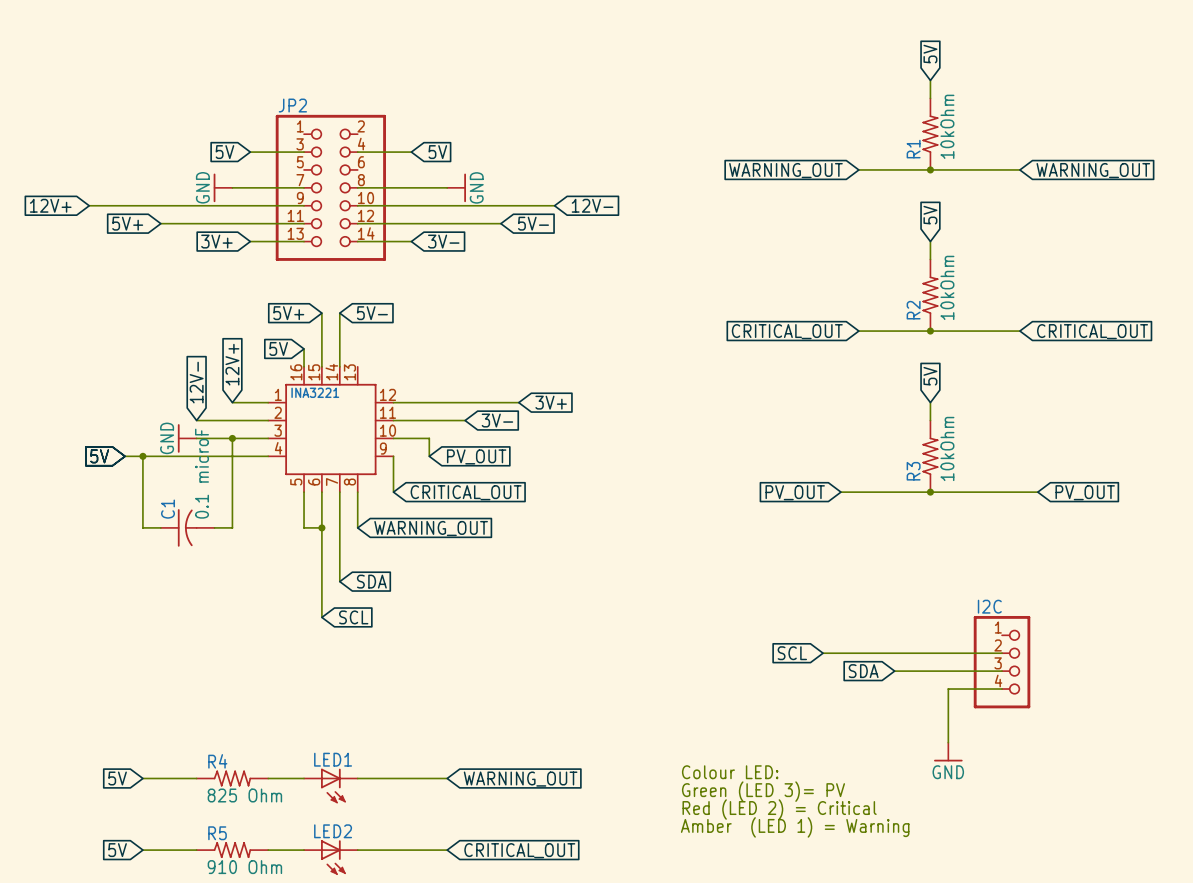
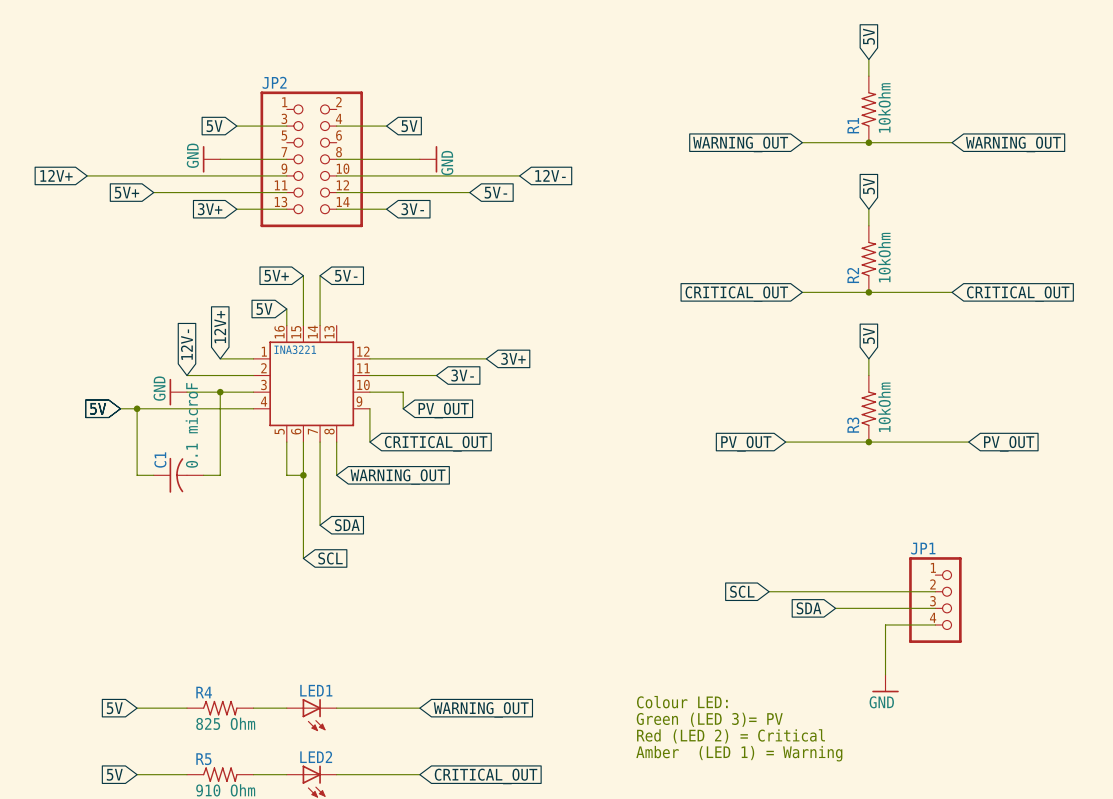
I2C name: I2C (989, 606) -> JP1 (923, 548)

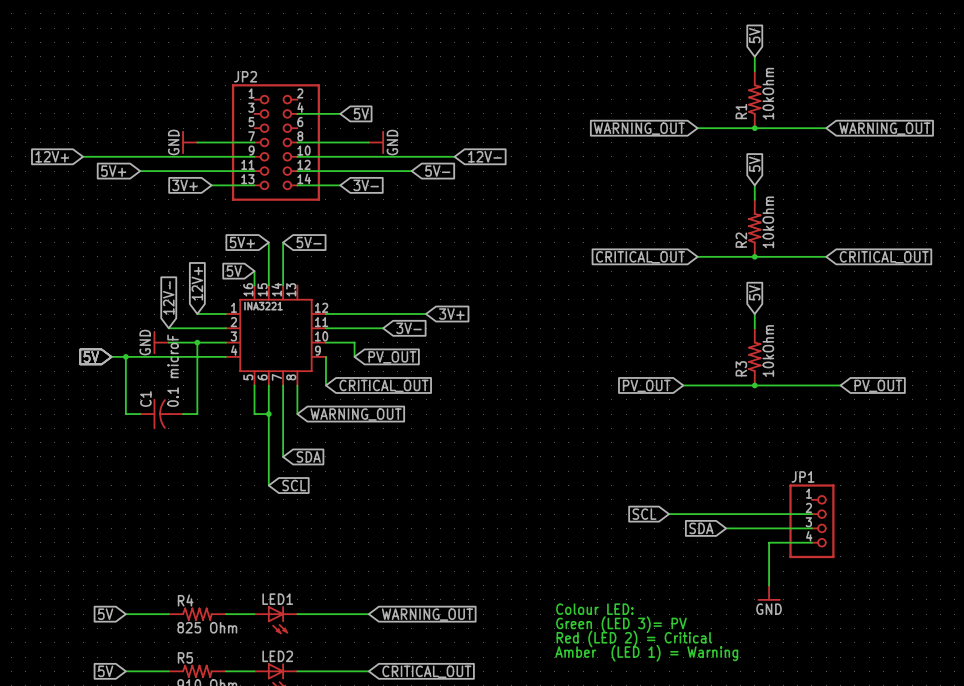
global label: 5V (214, 126) -> none
wire: (236, 126) (286, 126) -> none

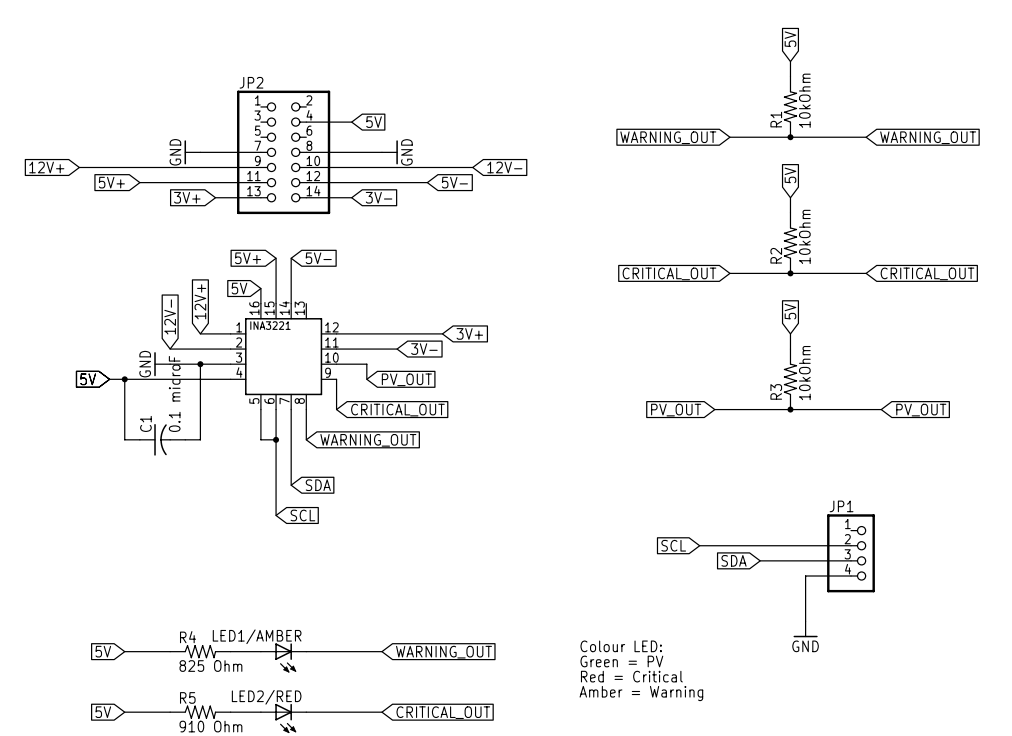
LED1 name: LED1 (277, 599) -> LED1/AMBER (257, 636)
text: Green (LED 3)= PV (621, 624) -> Green = PV (621, 661)
text: Red (LED 2) = Critical (634, 638) -> Red = Critical (631, 676)
text: Amber (LED 1) = Warning (646, 653) -> Amber = Warning (641, 693)
LED2 name: LED2 (277, 656) -> LED2/RED (266, 697)

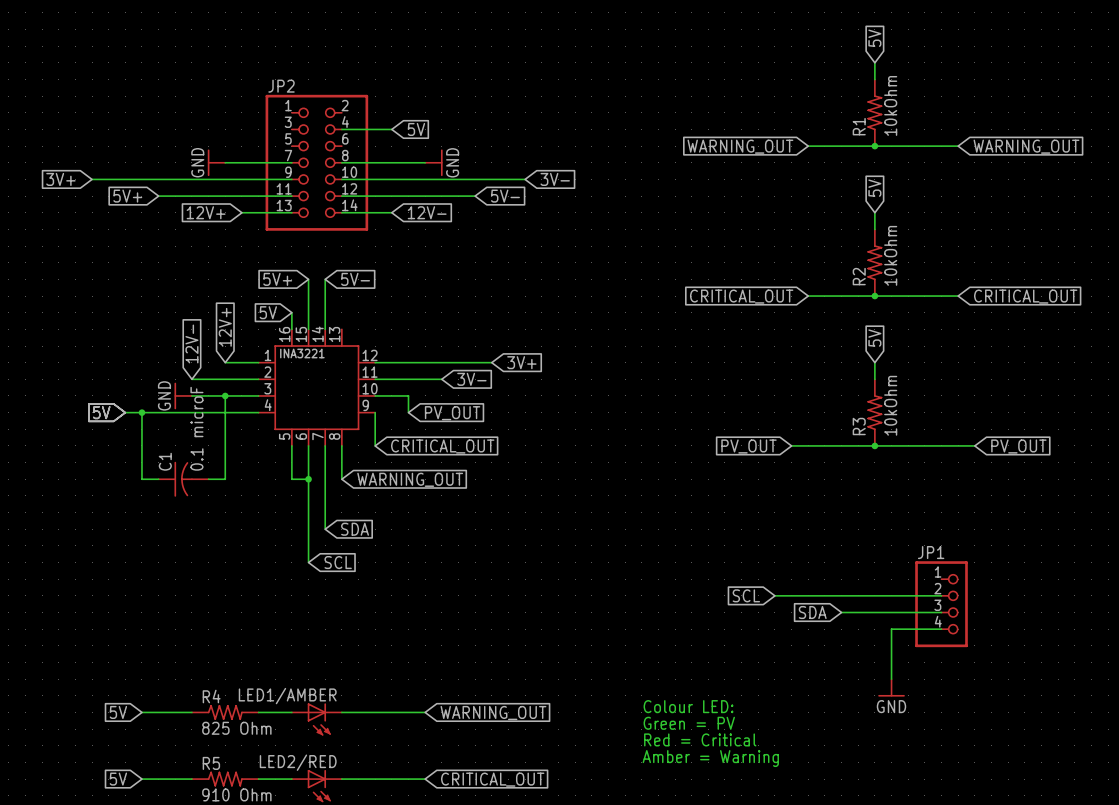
global label: 12V+ (46, 167) -> 3V+ (60, 179)
global label: 12V- (504, 167) -> 3V- (555, 179)
global label: 3V+ (187, 197) -> 12V+ (206, 212)
global label: 3V- (379, 197) -> 12V- (427, 212)

